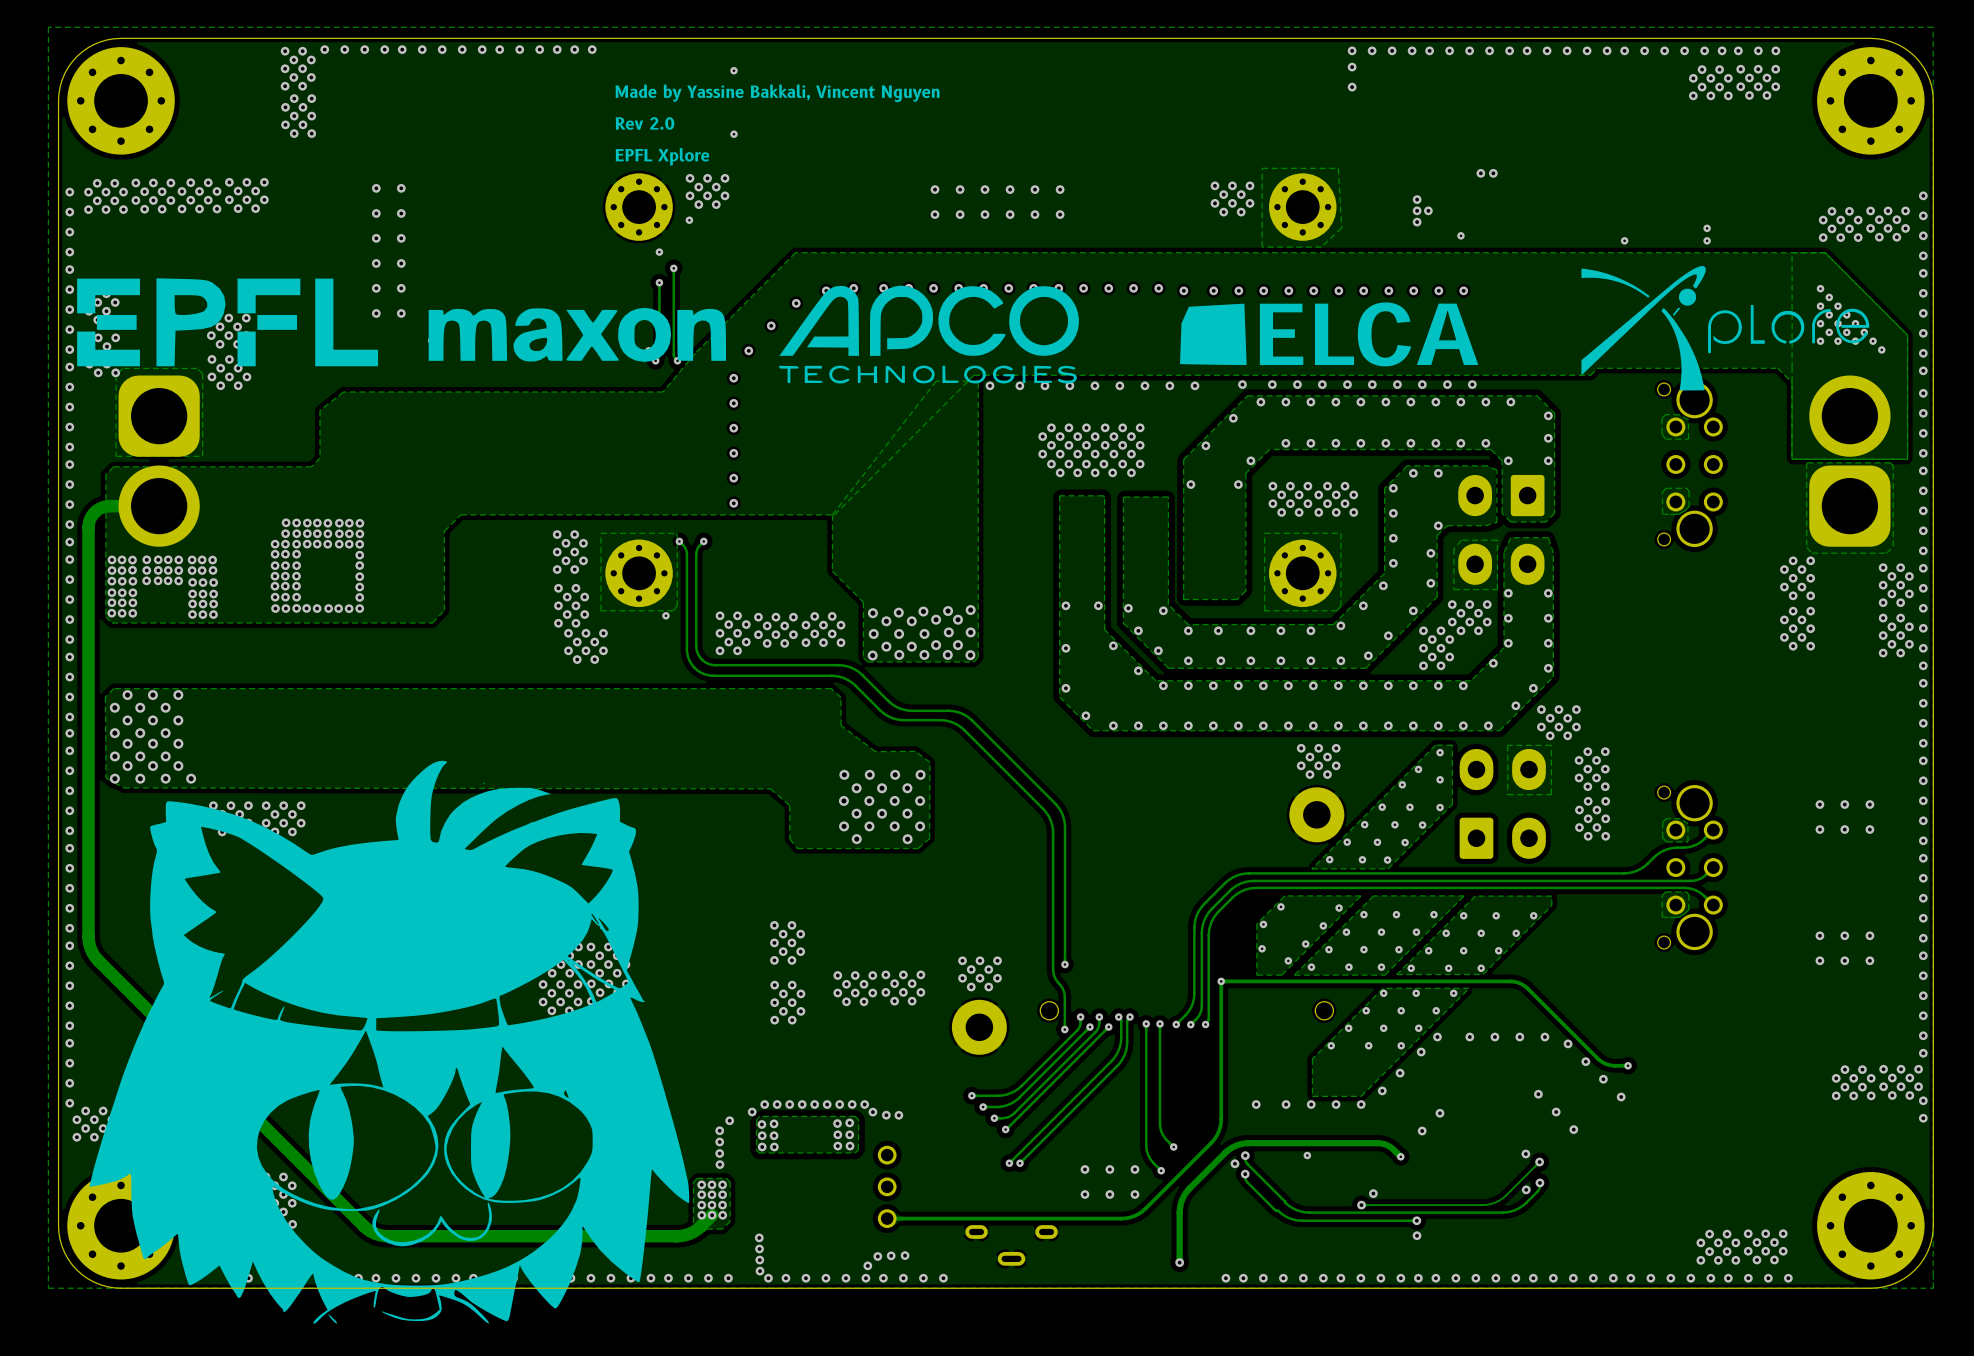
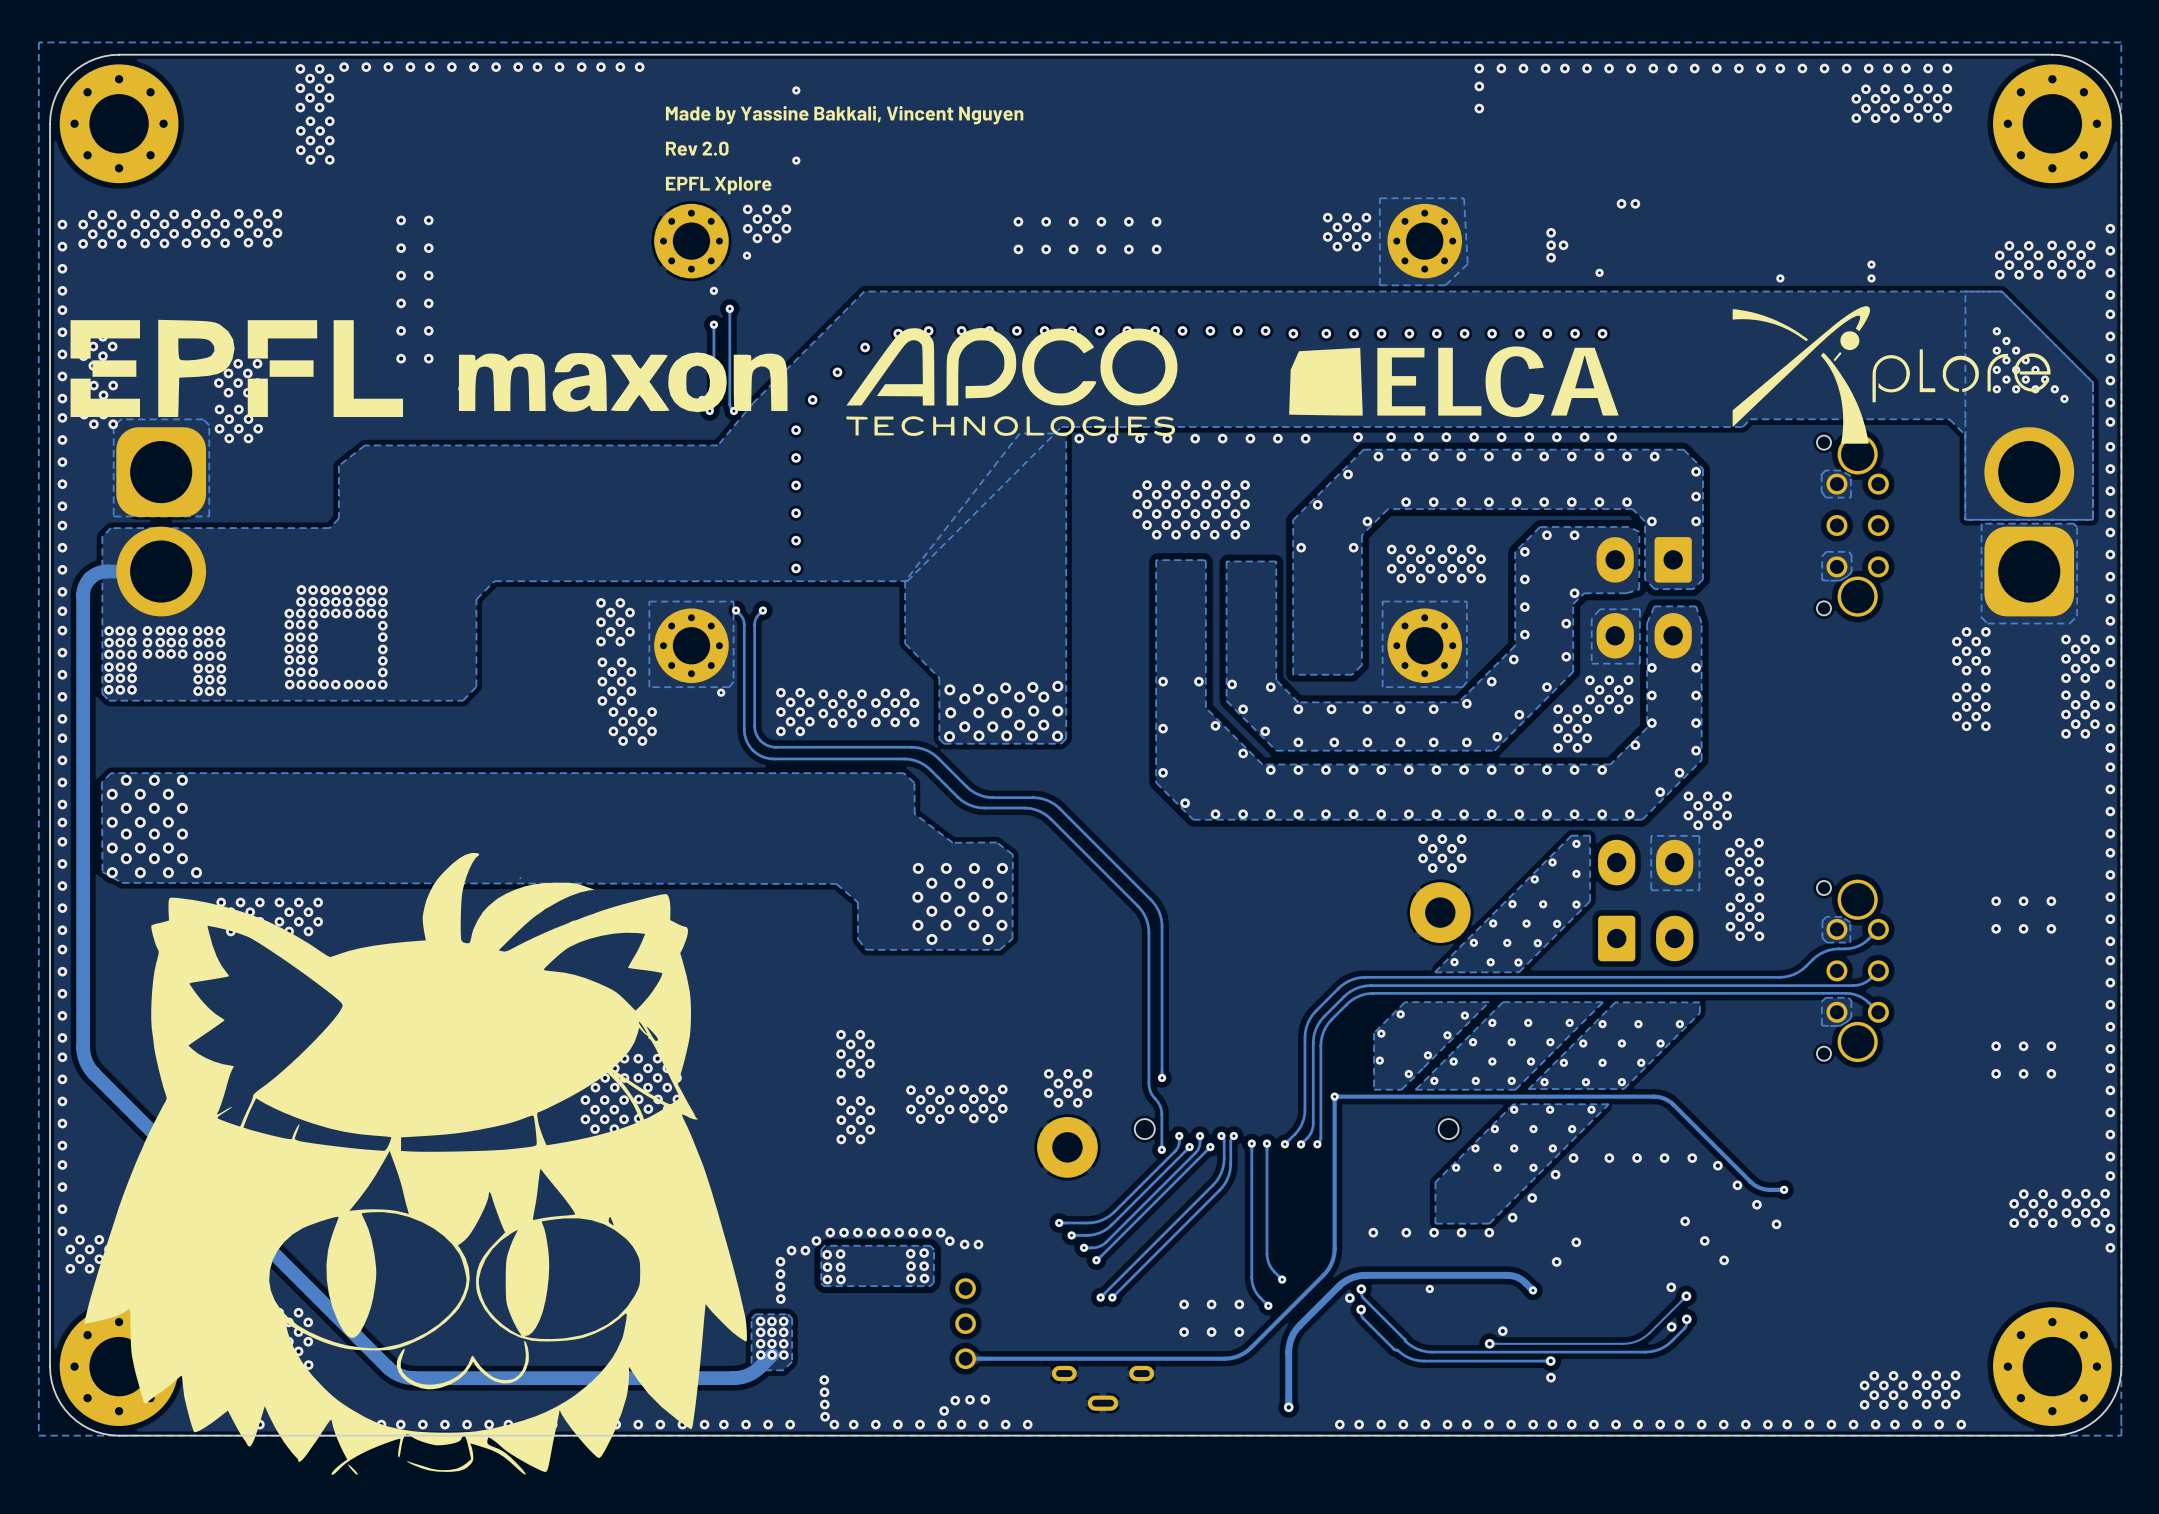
via: none -> (805, 1250)

